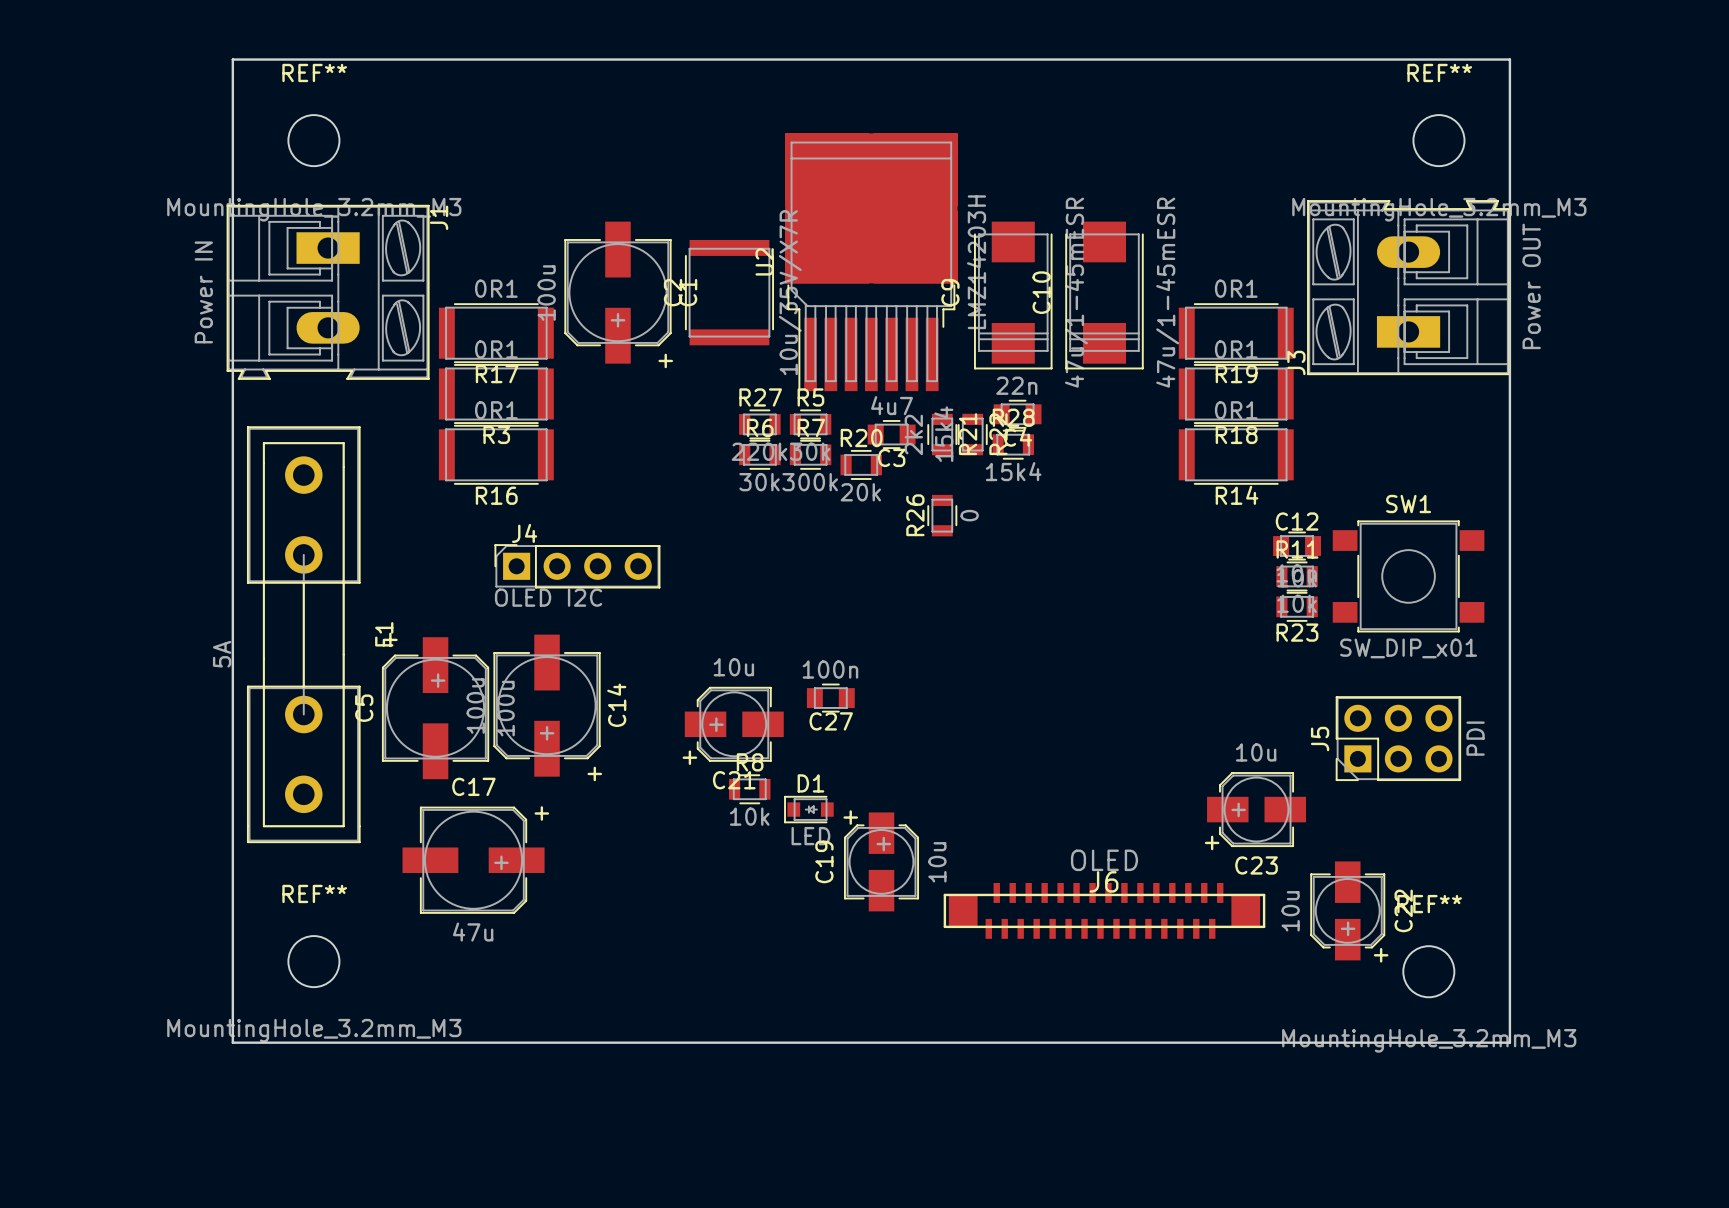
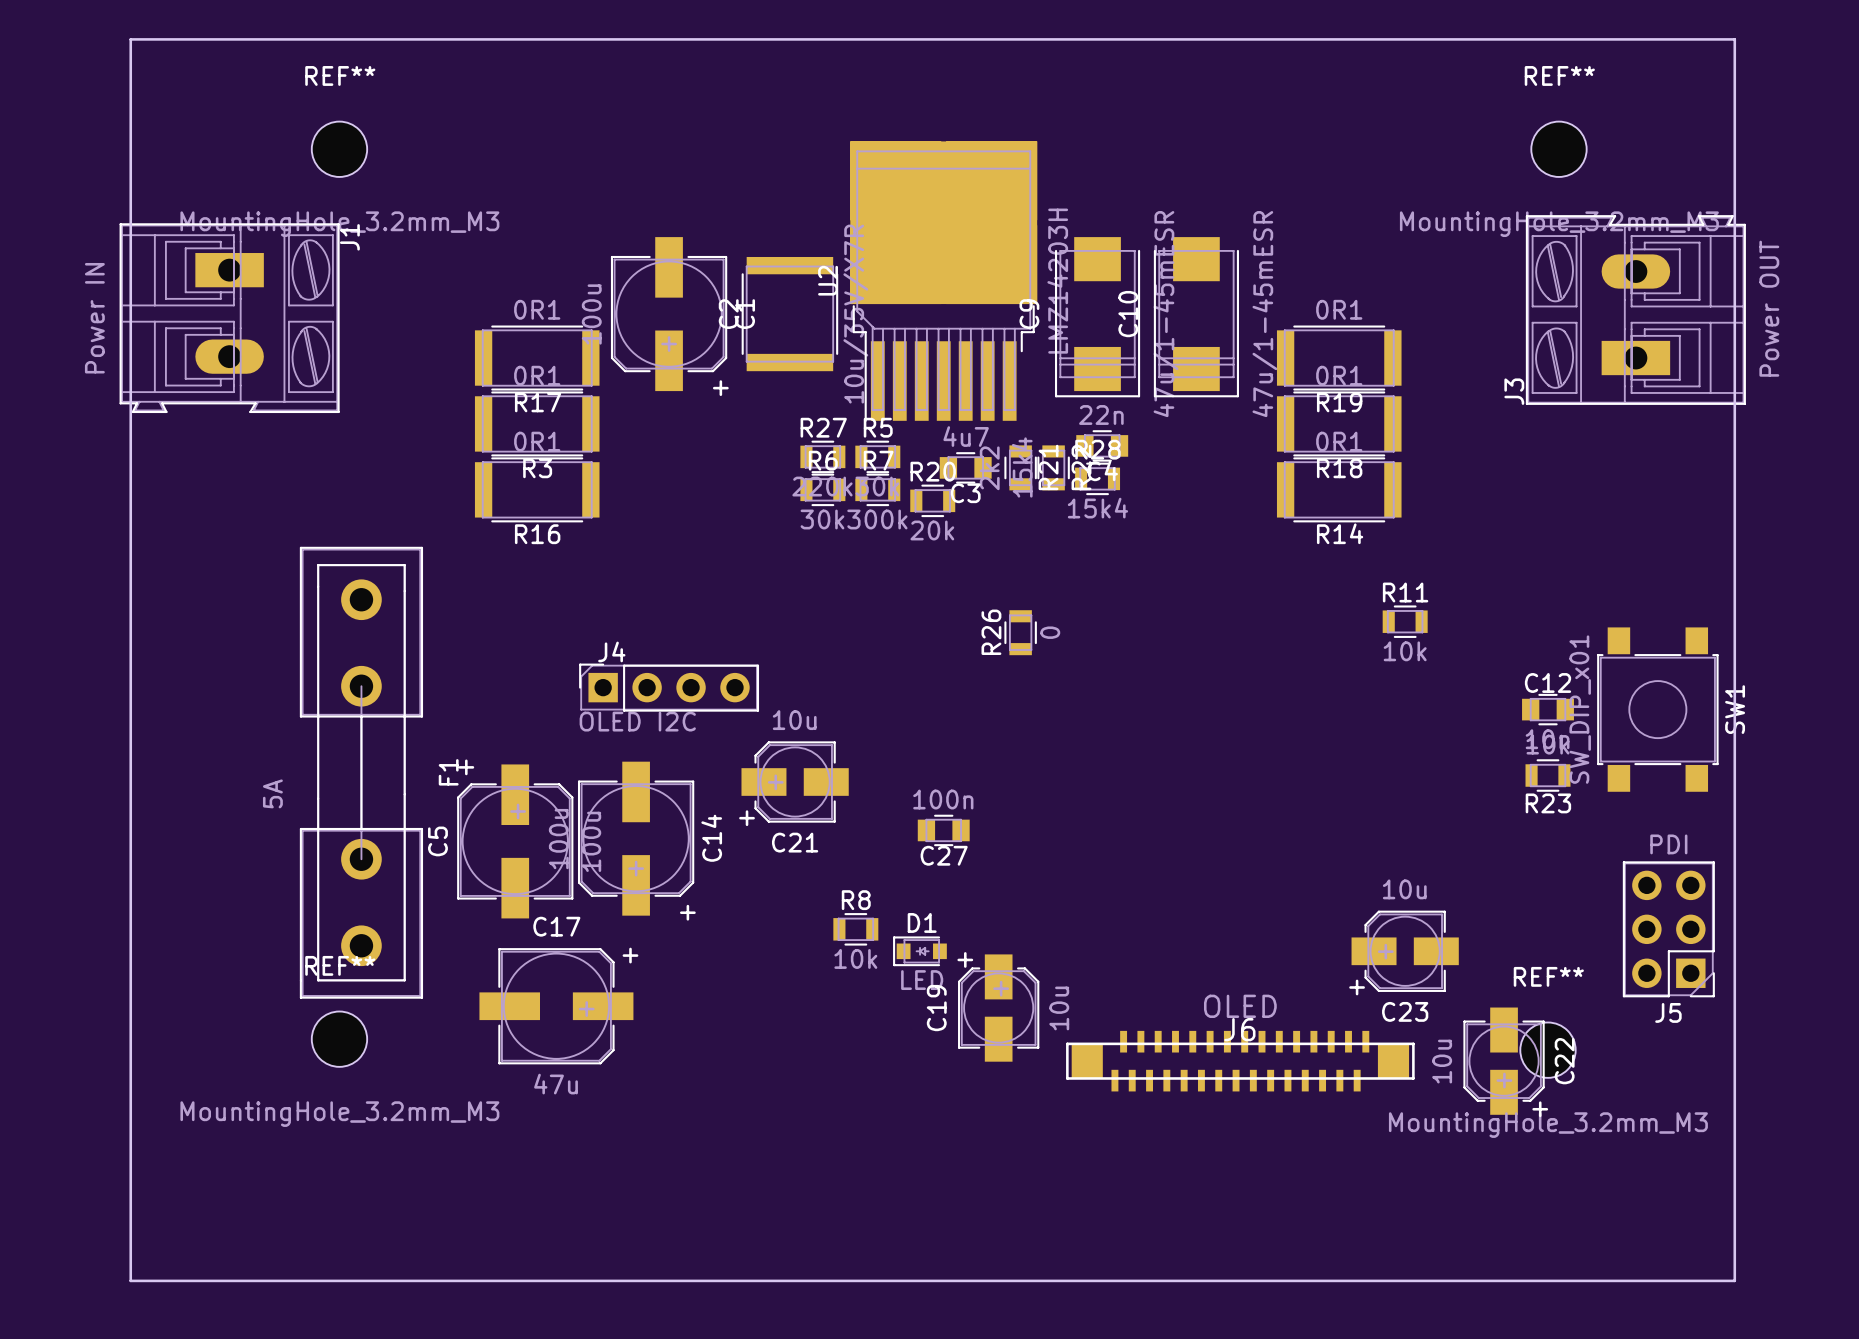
board edge: (232, 59) (232, 1042) (1509, 1042) (1509, 59) (232, 59) -> (130, 39) (130, 1280) (1734, 1280) (1734, 39) (130, 39)
J3 position: (1408, 287) -> (1635, 310)
J1 position: (328, 292) -> (229, 318)
R26 position: (942, 515) -> (1020, 632)
C12 position: (1297, 546) -> (1547, 709)
J4 position: (577, 566) -> (669, 687)
SW1 rotation: 0° (1408, 576) -> 90° clockwise (1657, 709)
SW1 position: (1408, 576) -> (1657, 709)
R23 position: (1297, 606) -> (1547, 775)
F1 position: (303, 634) -> (361, 772)
C27 position: (830, 698) -> (943, 830)
C14 position: (547, 705) -> (636, 838)
C5 position: (435, 708) -> (515, 841)
J5 rotation: 0° (1398, 738) -> 90° counterclockwise (1668, 929)
J5 position: (1398, 738) -> (1668, 929)
R8 position: (749, 789) -> (855, 929)
D1 position: (808, 809) -> (919, 951)
C23 position: (1256, 809) -> (1405, 951)
C17 position: (473, 860) -> (556, 1006)
C19 position: (881, 861) -> (998, 1008)
J6 position: (1104, 910) -> (1240, 1061)
C22 position: (1347, 910) -> (1504, 1061)

